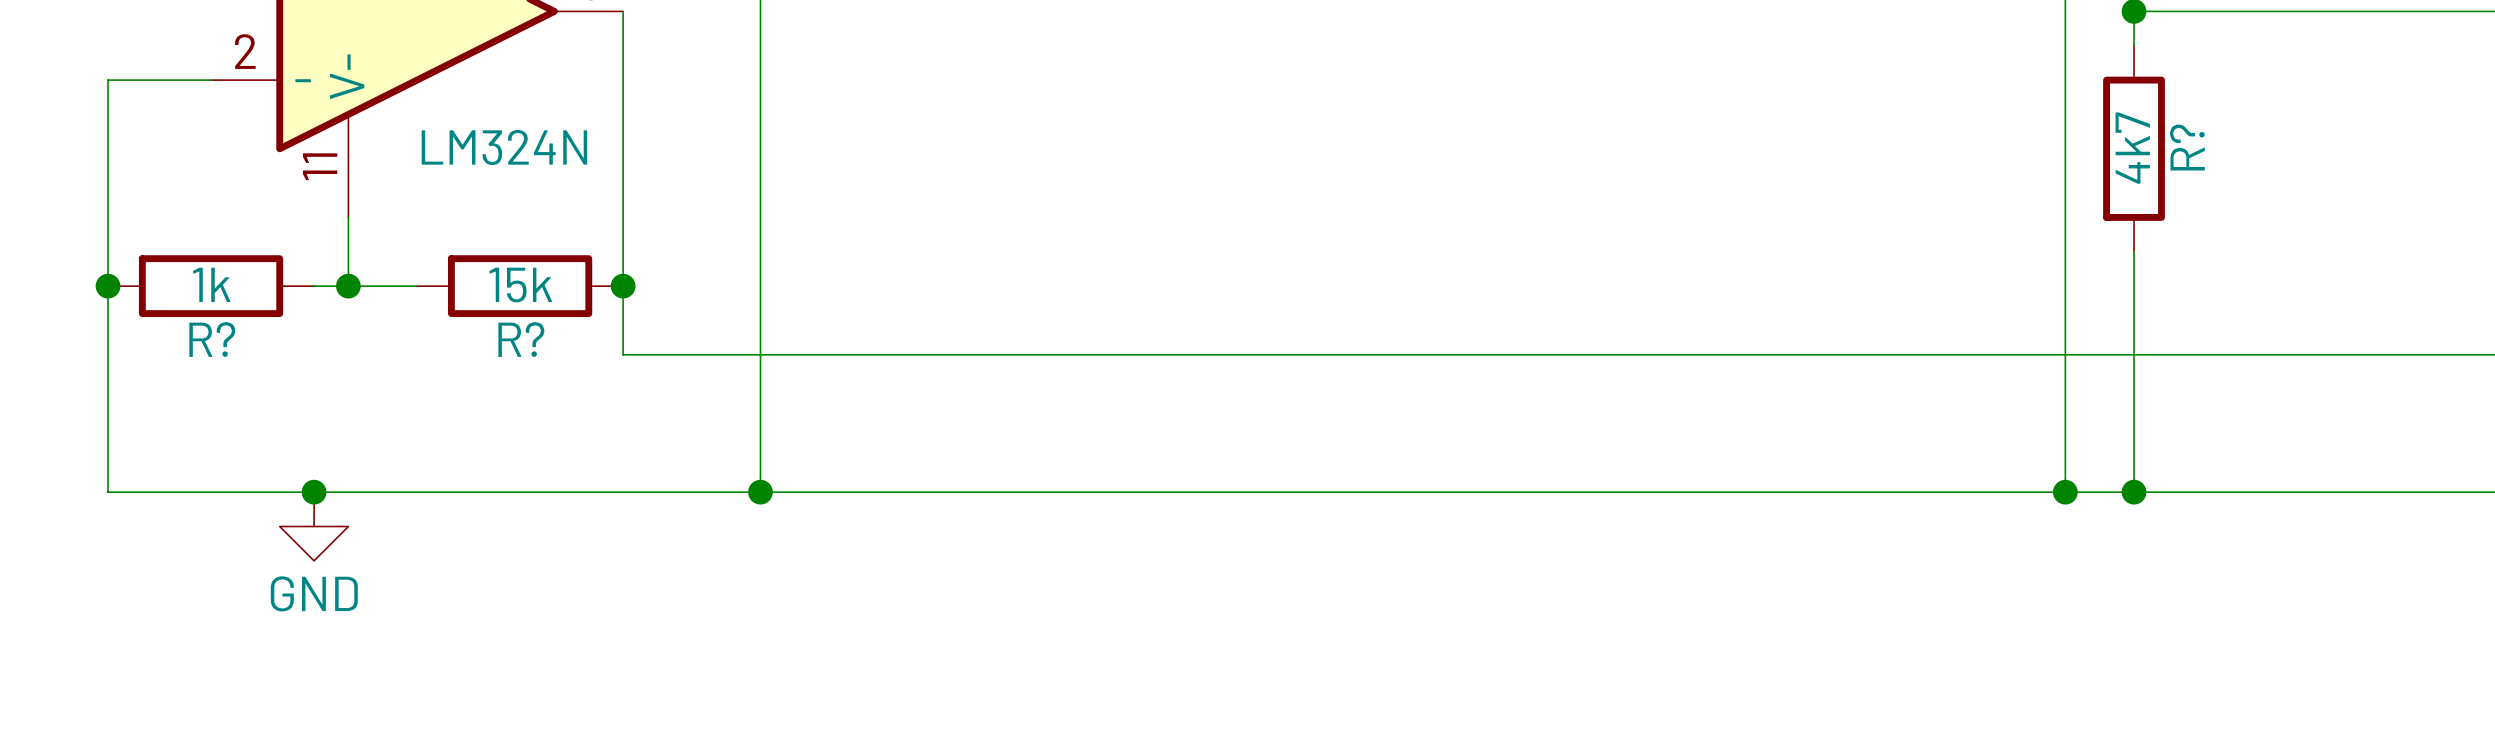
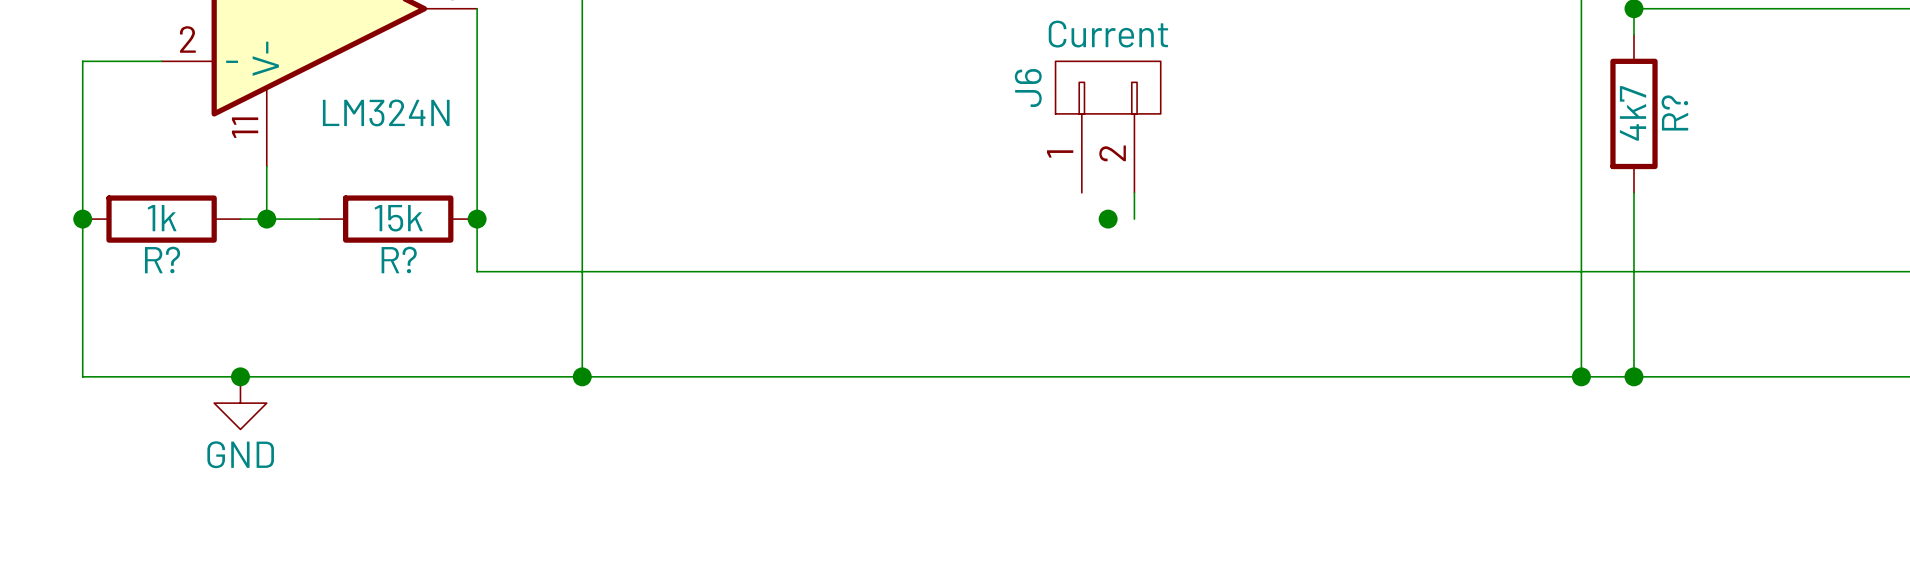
J6: none -> Current (1108, 127)
wire: none -> (1134, 192) (1134, 219)
junction: none -> (1108, 219)

